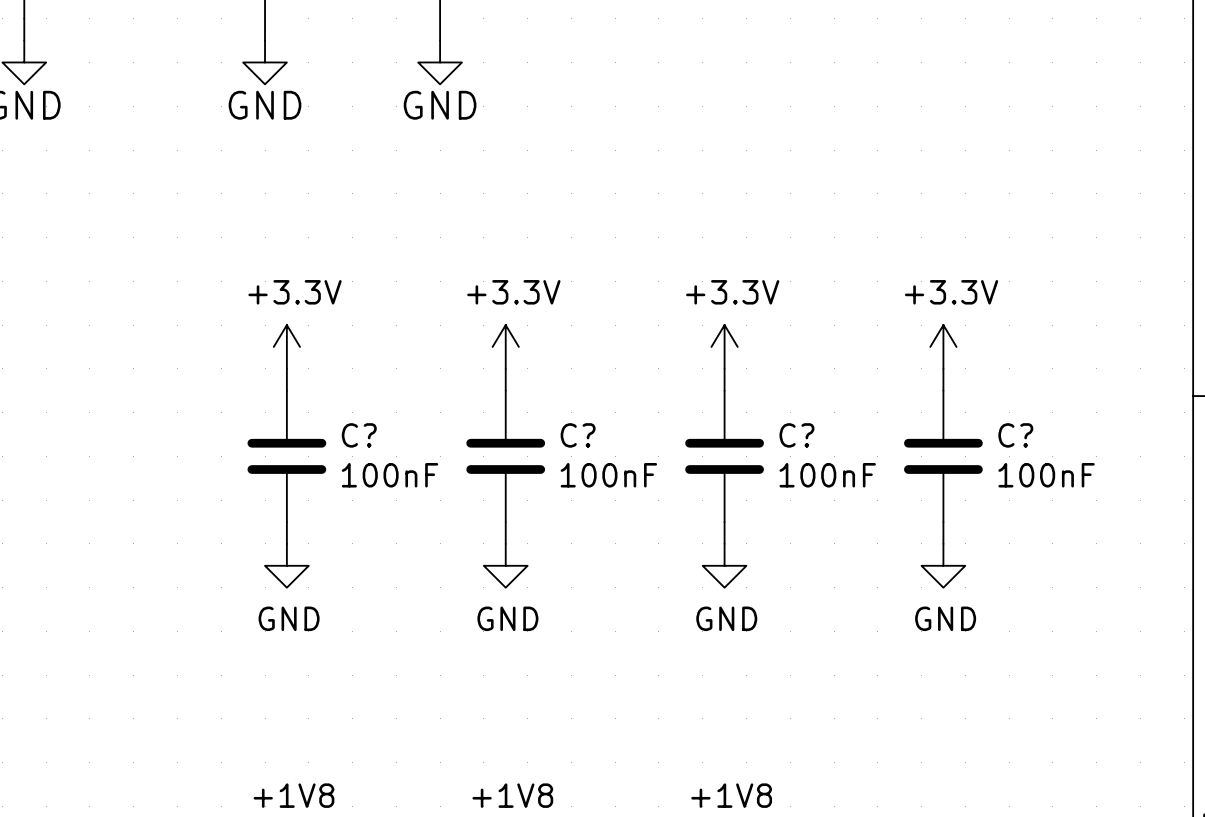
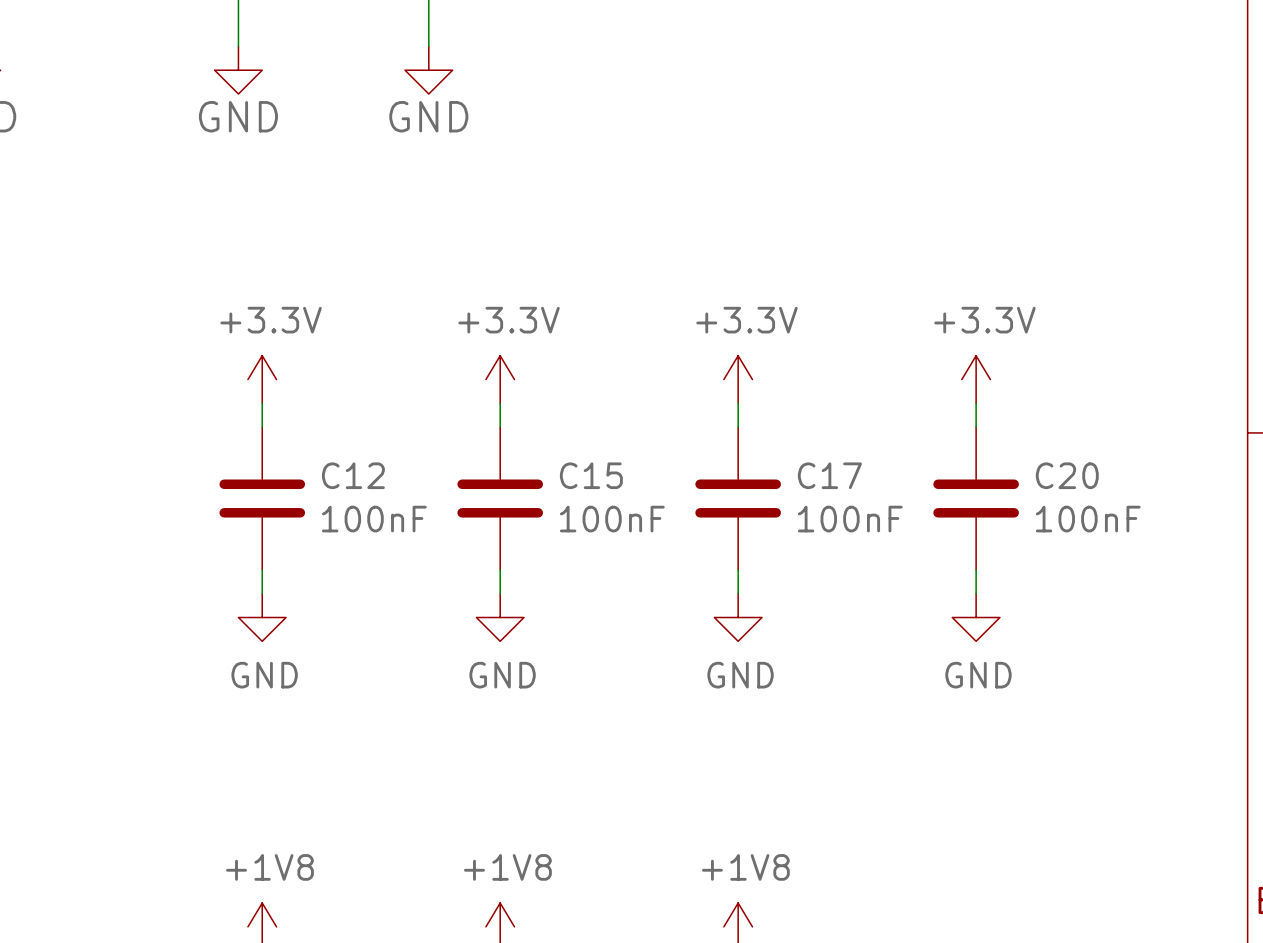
C? name: C? (359, 435) -> C12 (353, 475)
C? name: C? (578, 435) -> C15 (591, 475)
C? name: C? (796, 435) -> C17 (829, 475)
C? name: C? (1015, 435) -> C20 (1067, 475)

